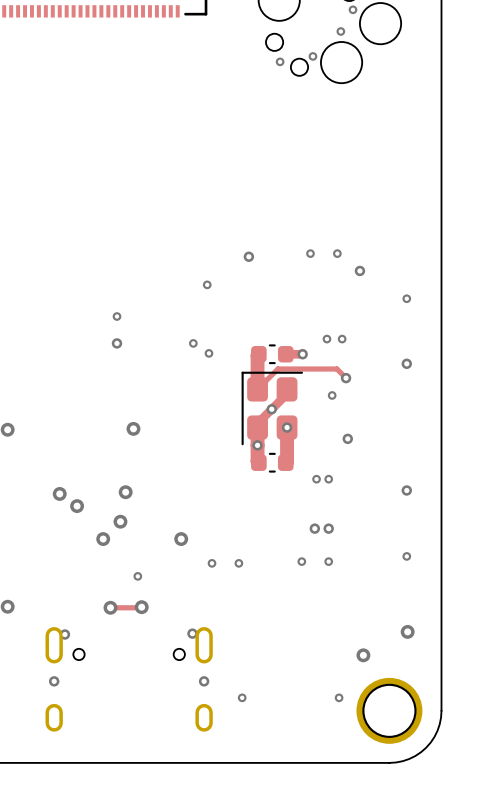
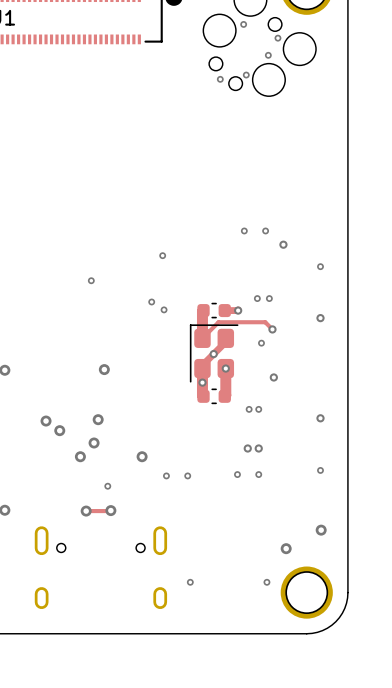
via: (248, 256) -> none
via: (116, 343) -> none
via: (192, 633) -> none
via: (64, 634) -> none
via: (54, 681) -> none
via: (204, 681) -> none

